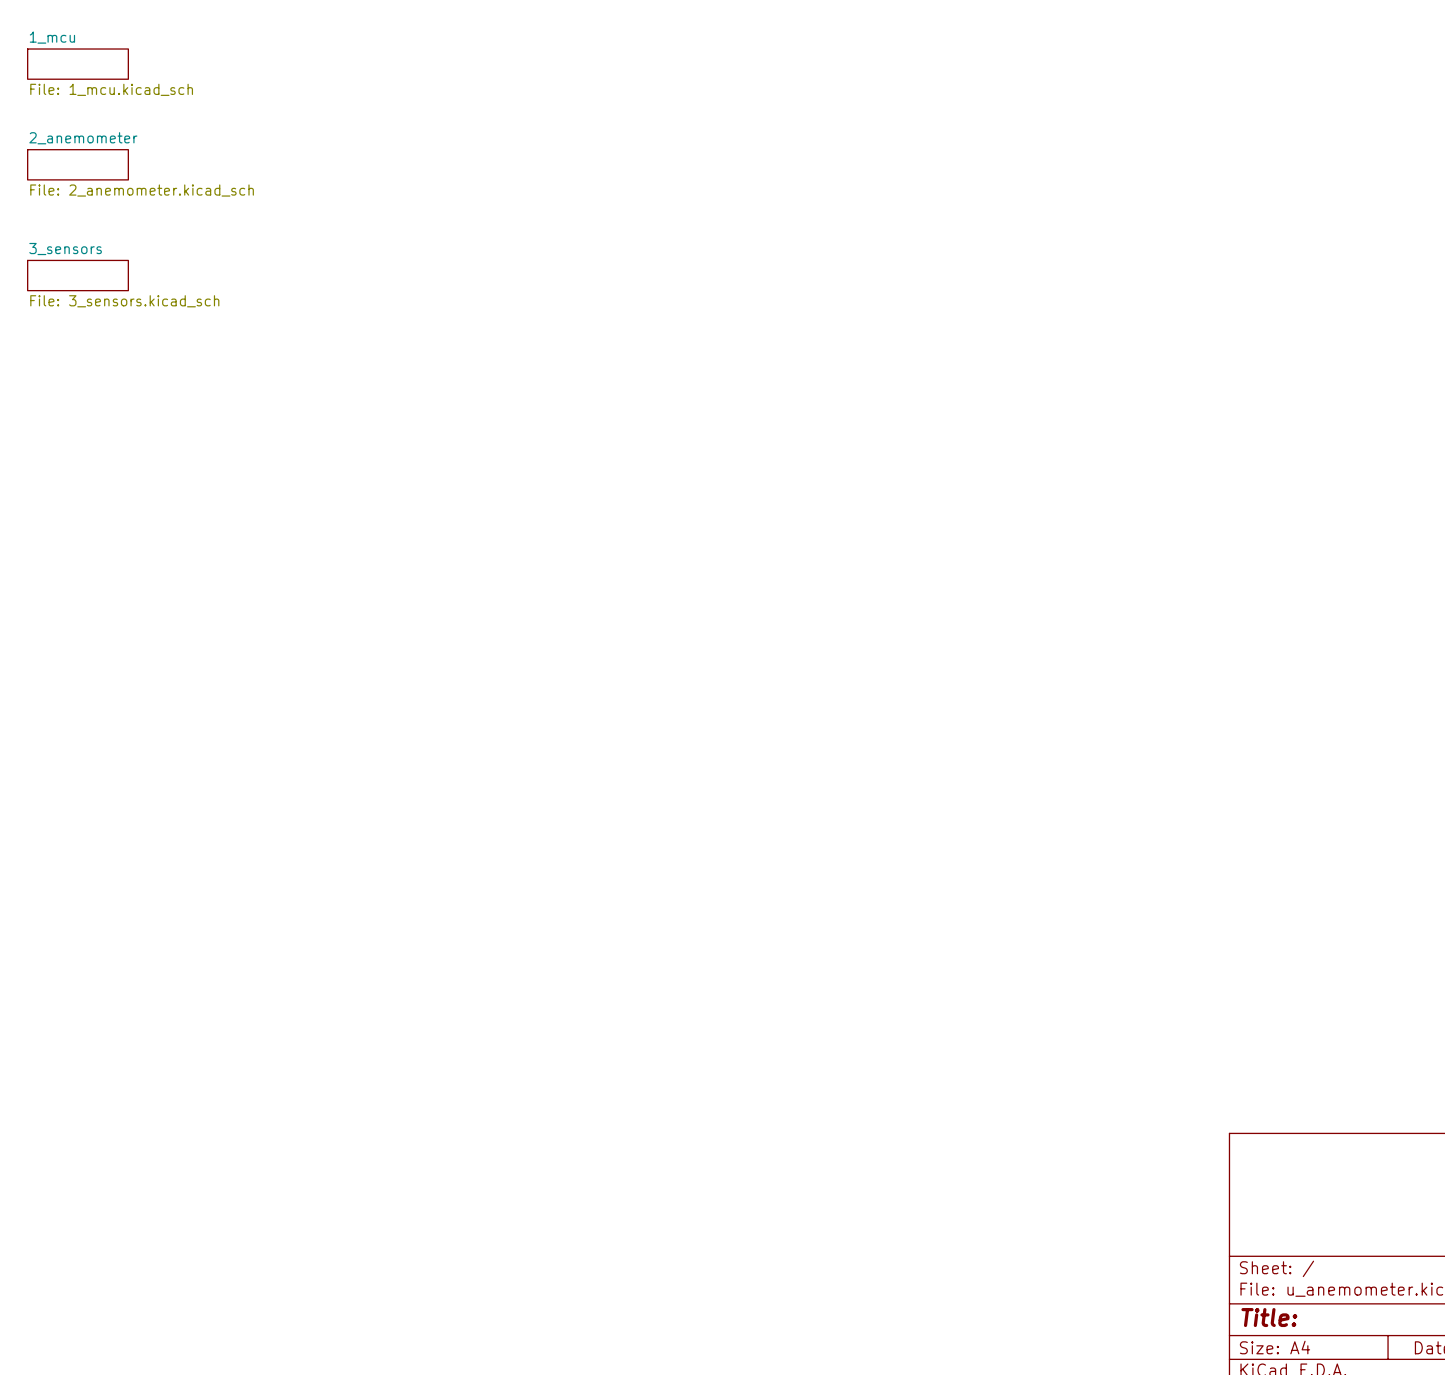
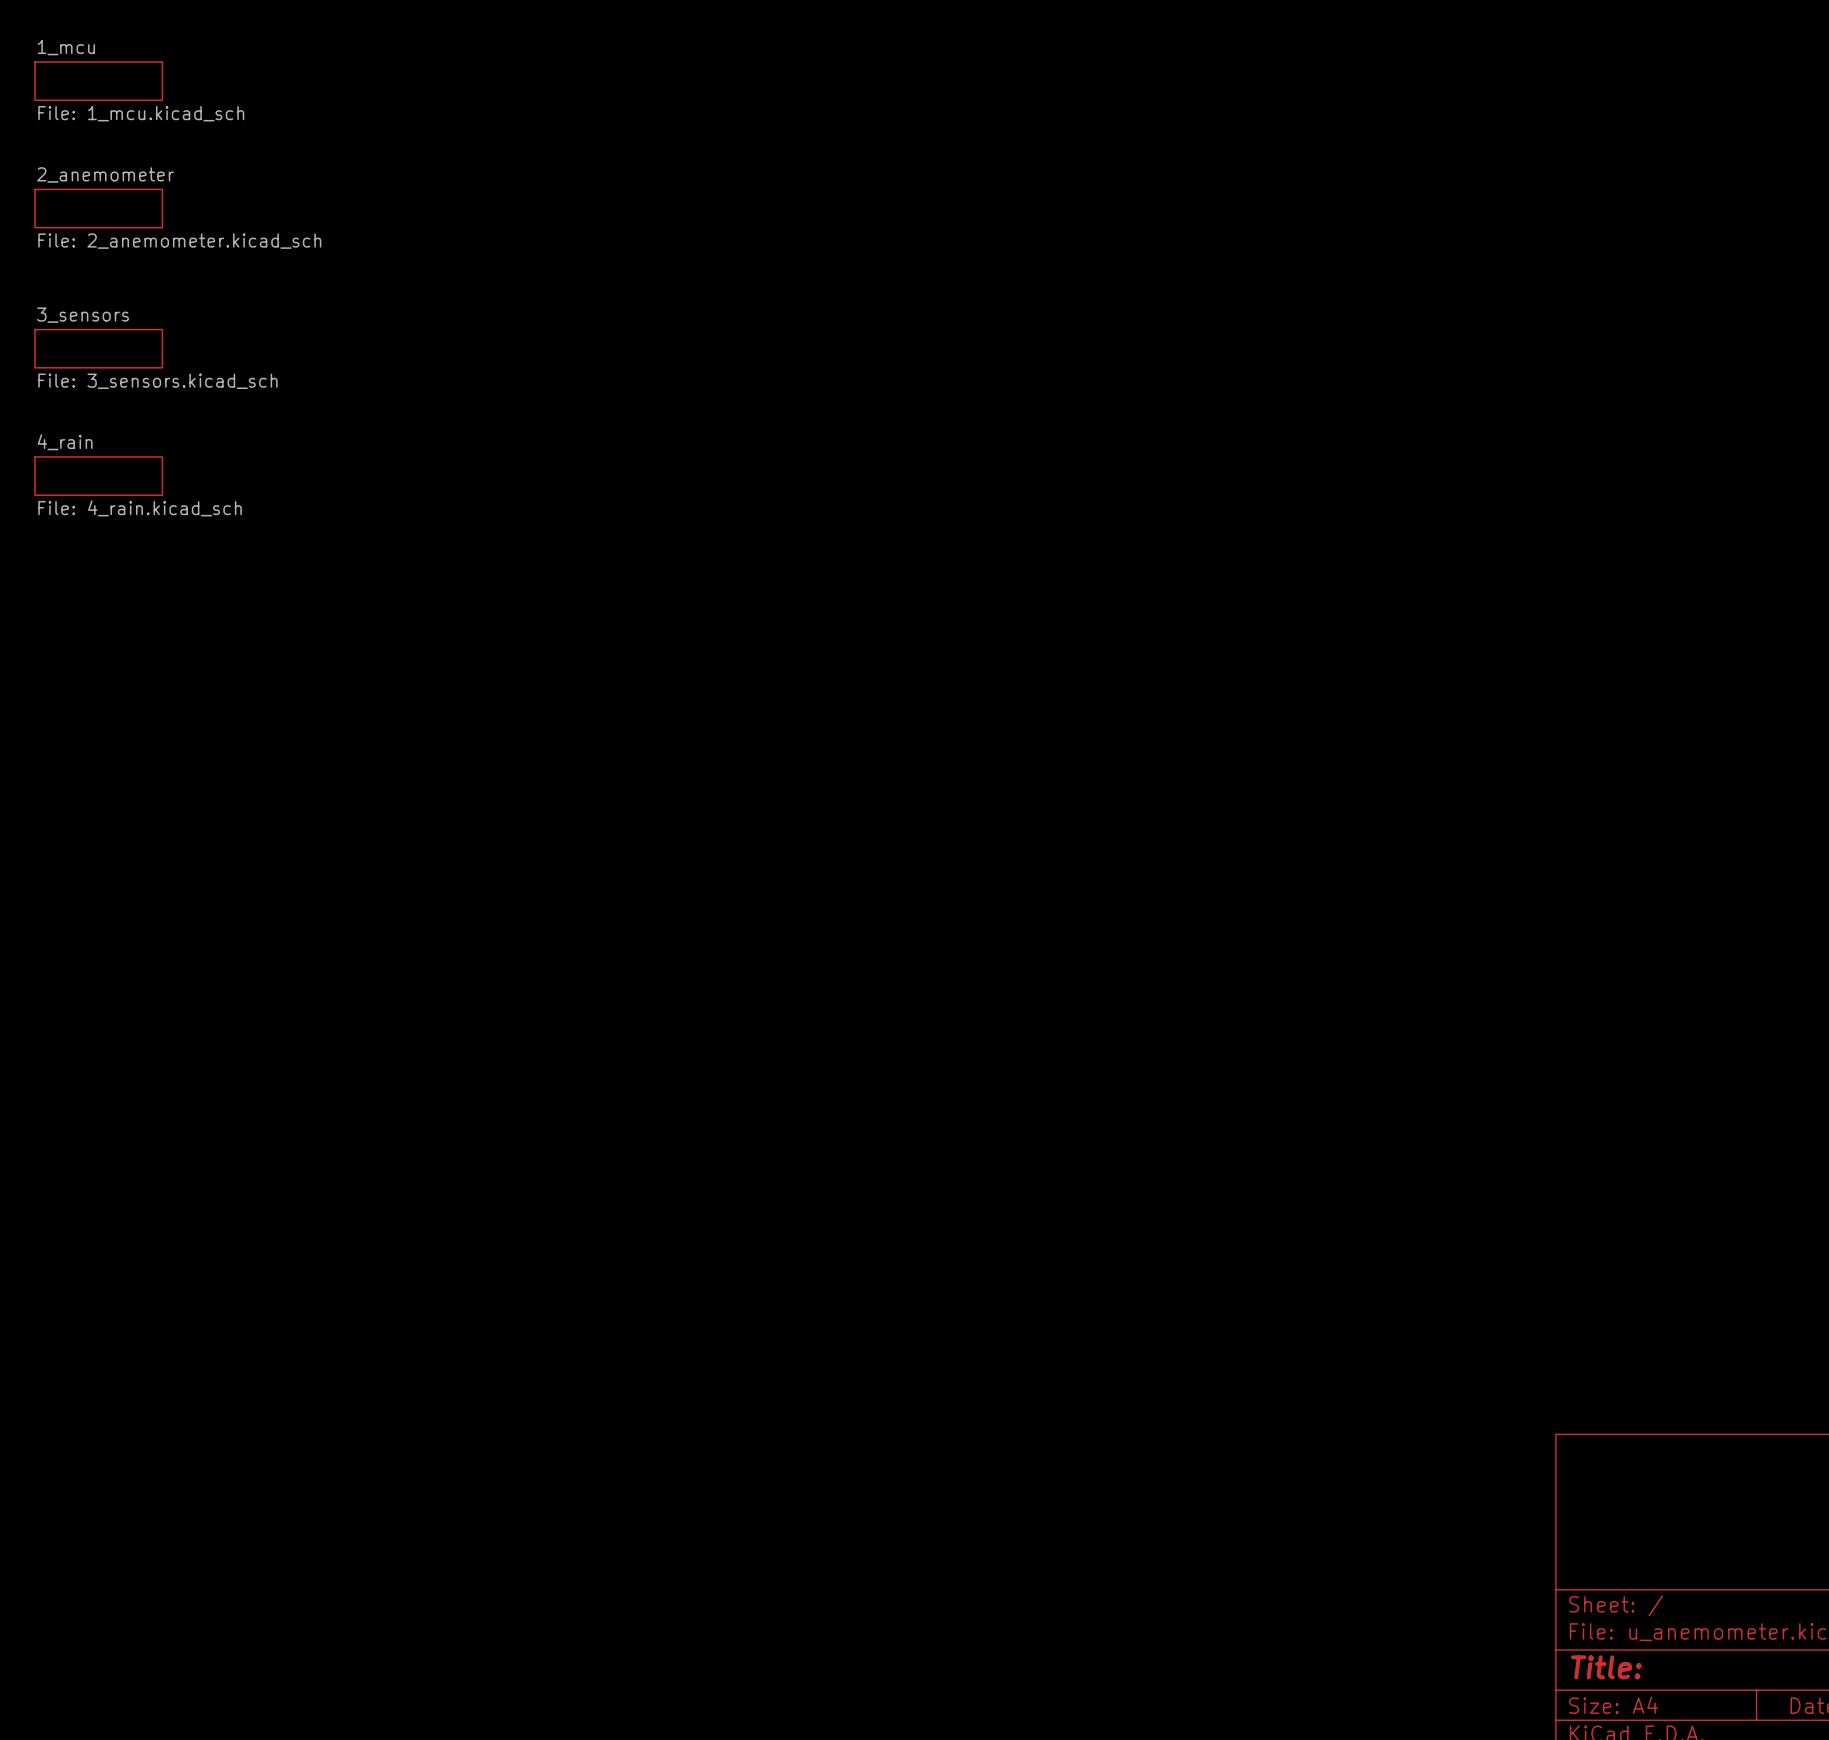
sheet 4_rain: none -> File: 4_rain.kicad_sch (98, 476)

